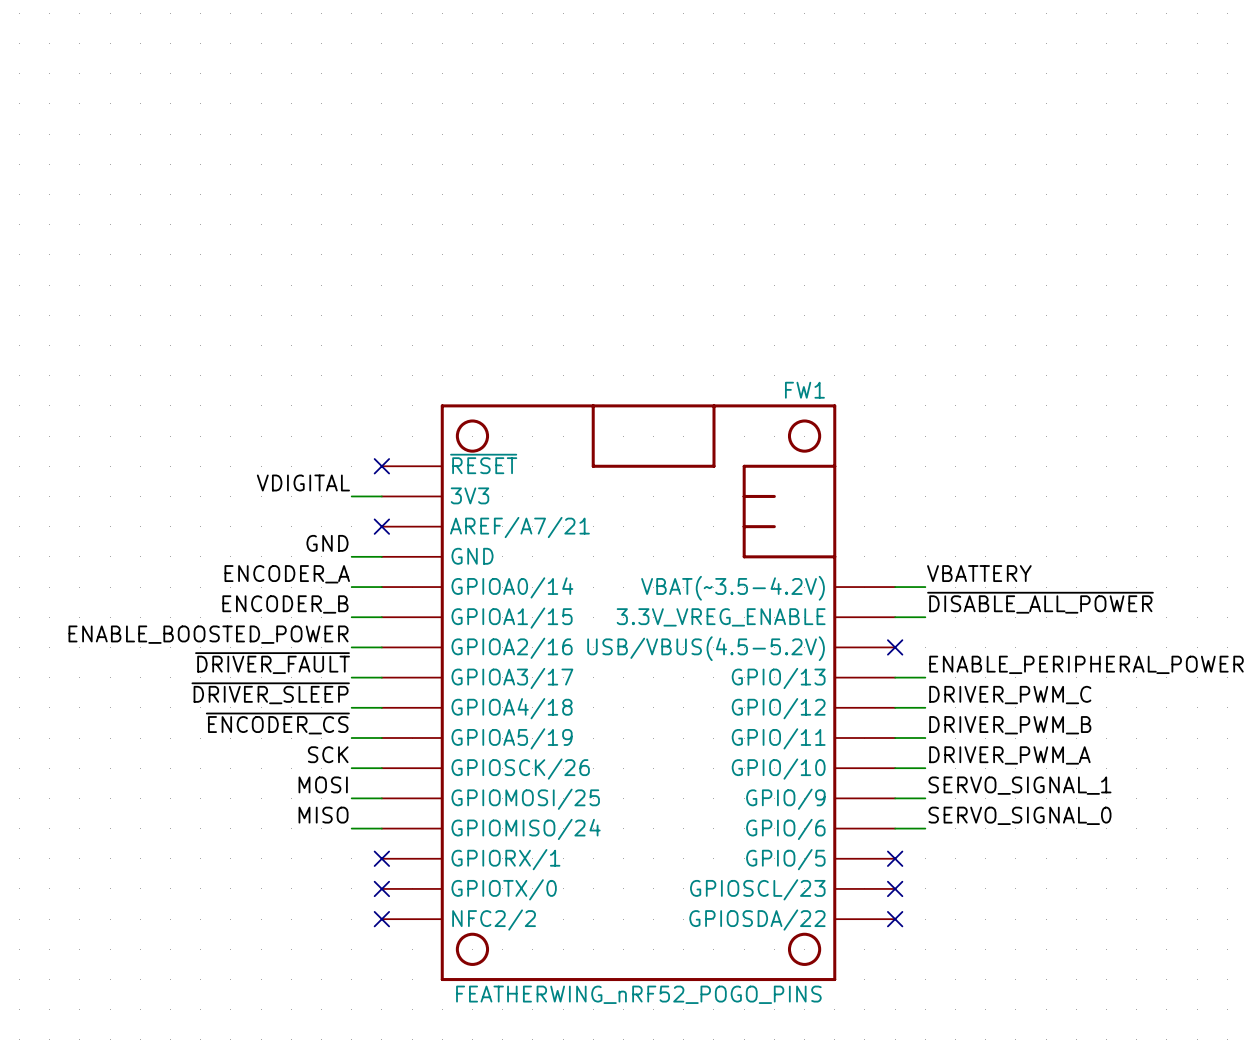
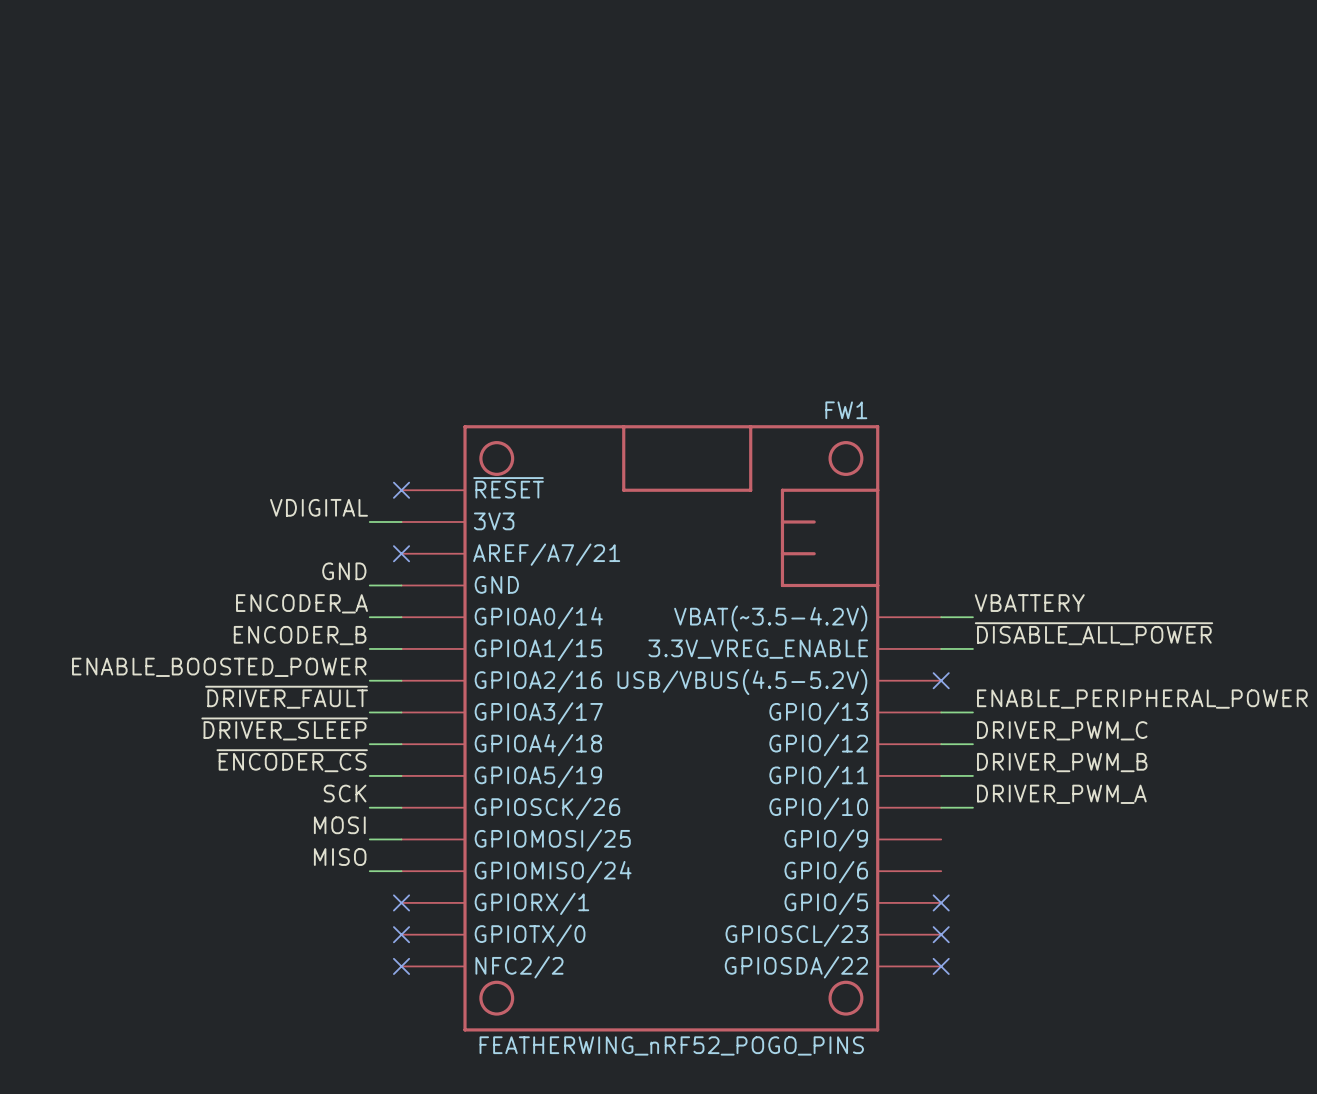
label: SERVO_SIGNAL_1 (1019, 785) -> none
wire: (895, 798) (925, 798) -> none
label: SERVO_SIGNAL_0 (1019, 815) -> none
wire: (895, 828) (925, 828) -> none

